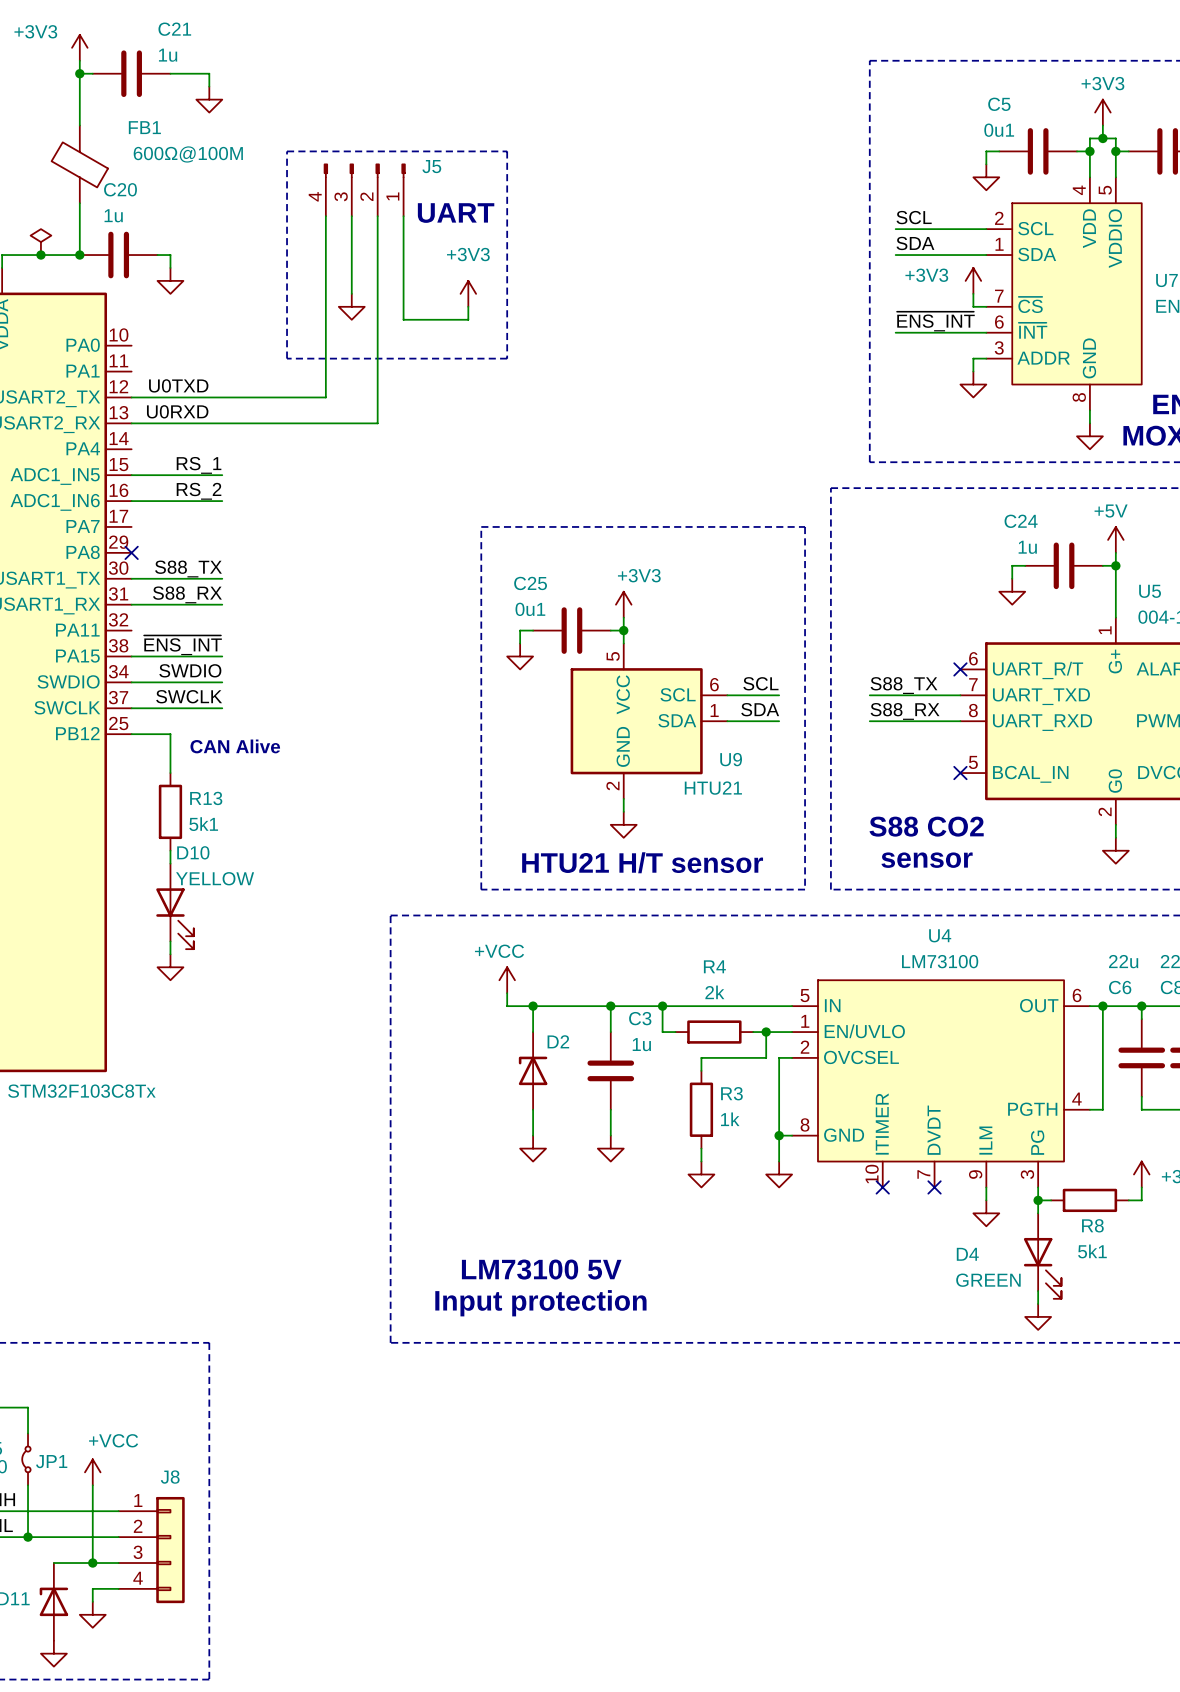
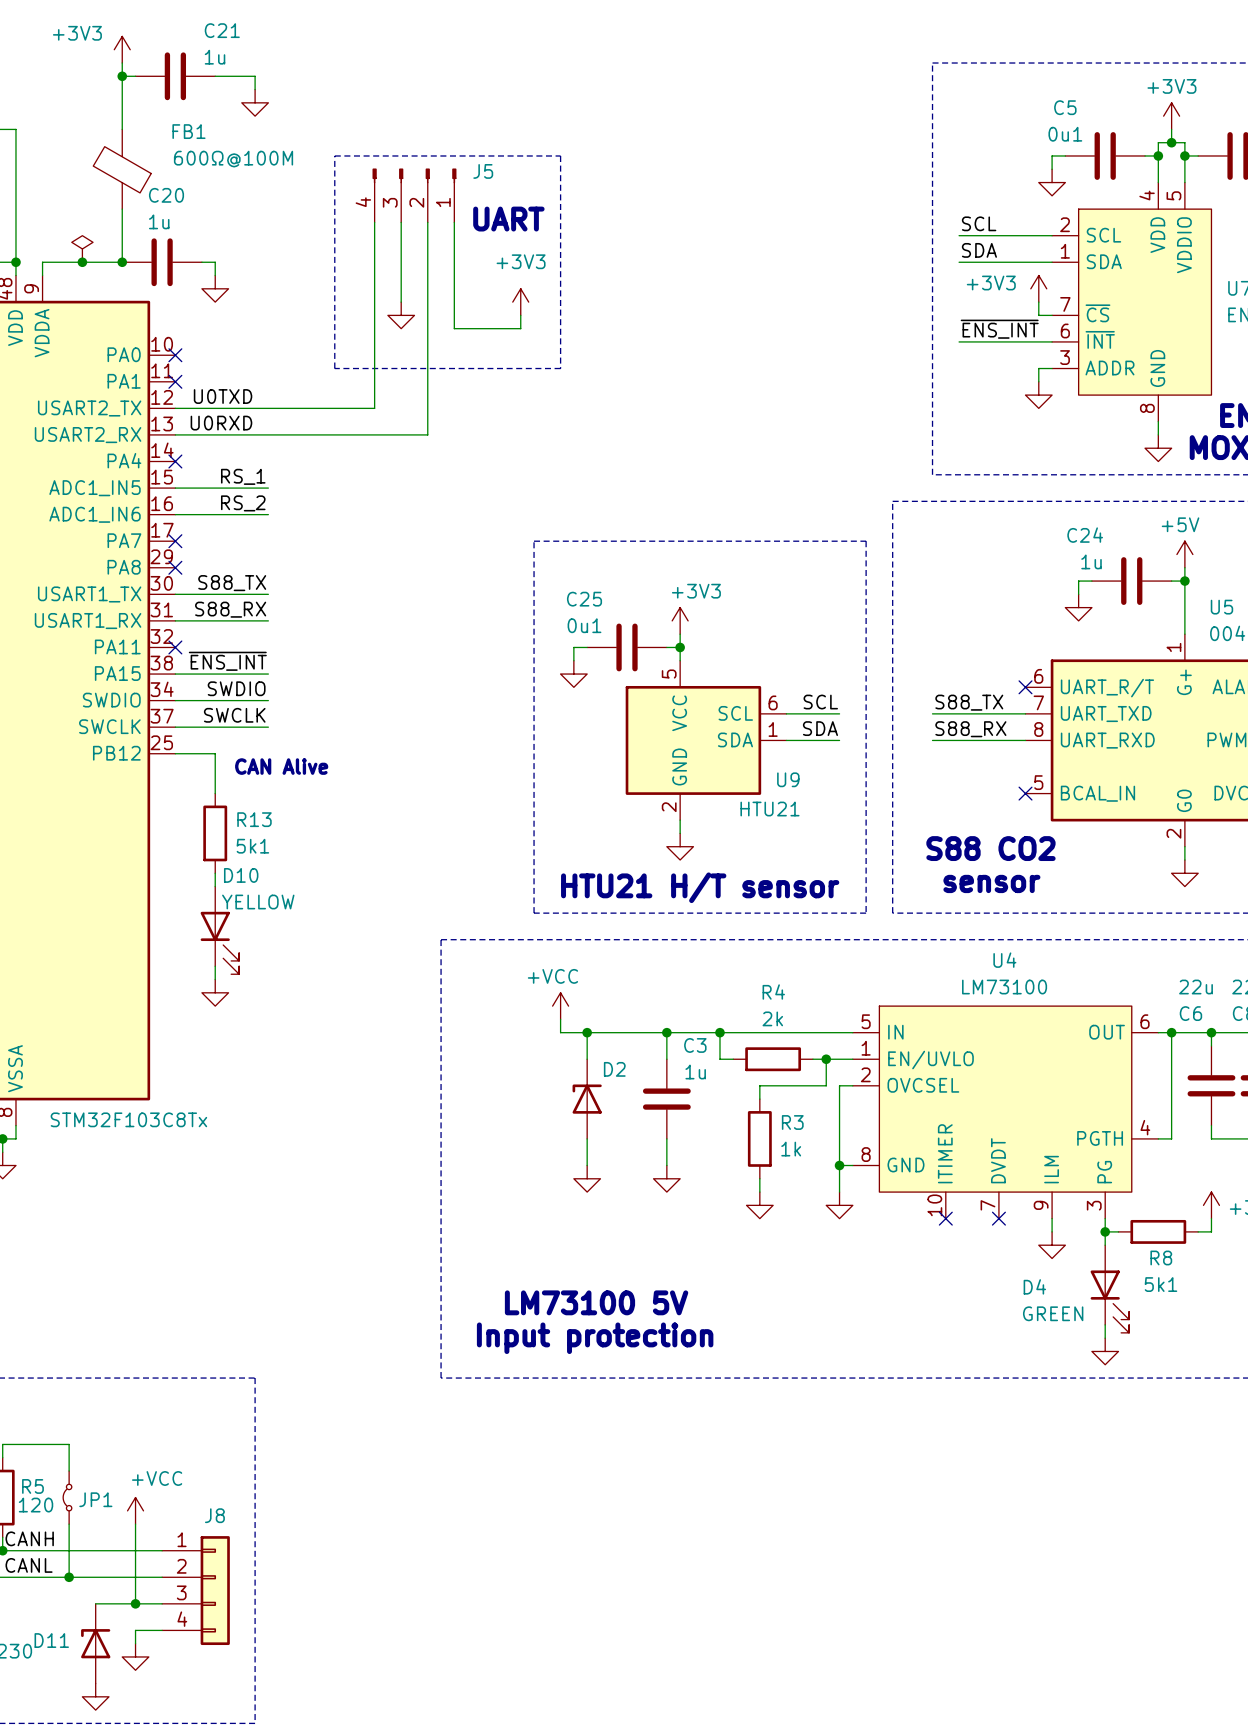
no-connect mark: none -> (175, 355)
no-connect mark: none -> (175, 381)
no-connect mark: none -> (175, 461)
no-connect mark: none -> (175, 541)
no-connect mark: none -> (175, 647)

